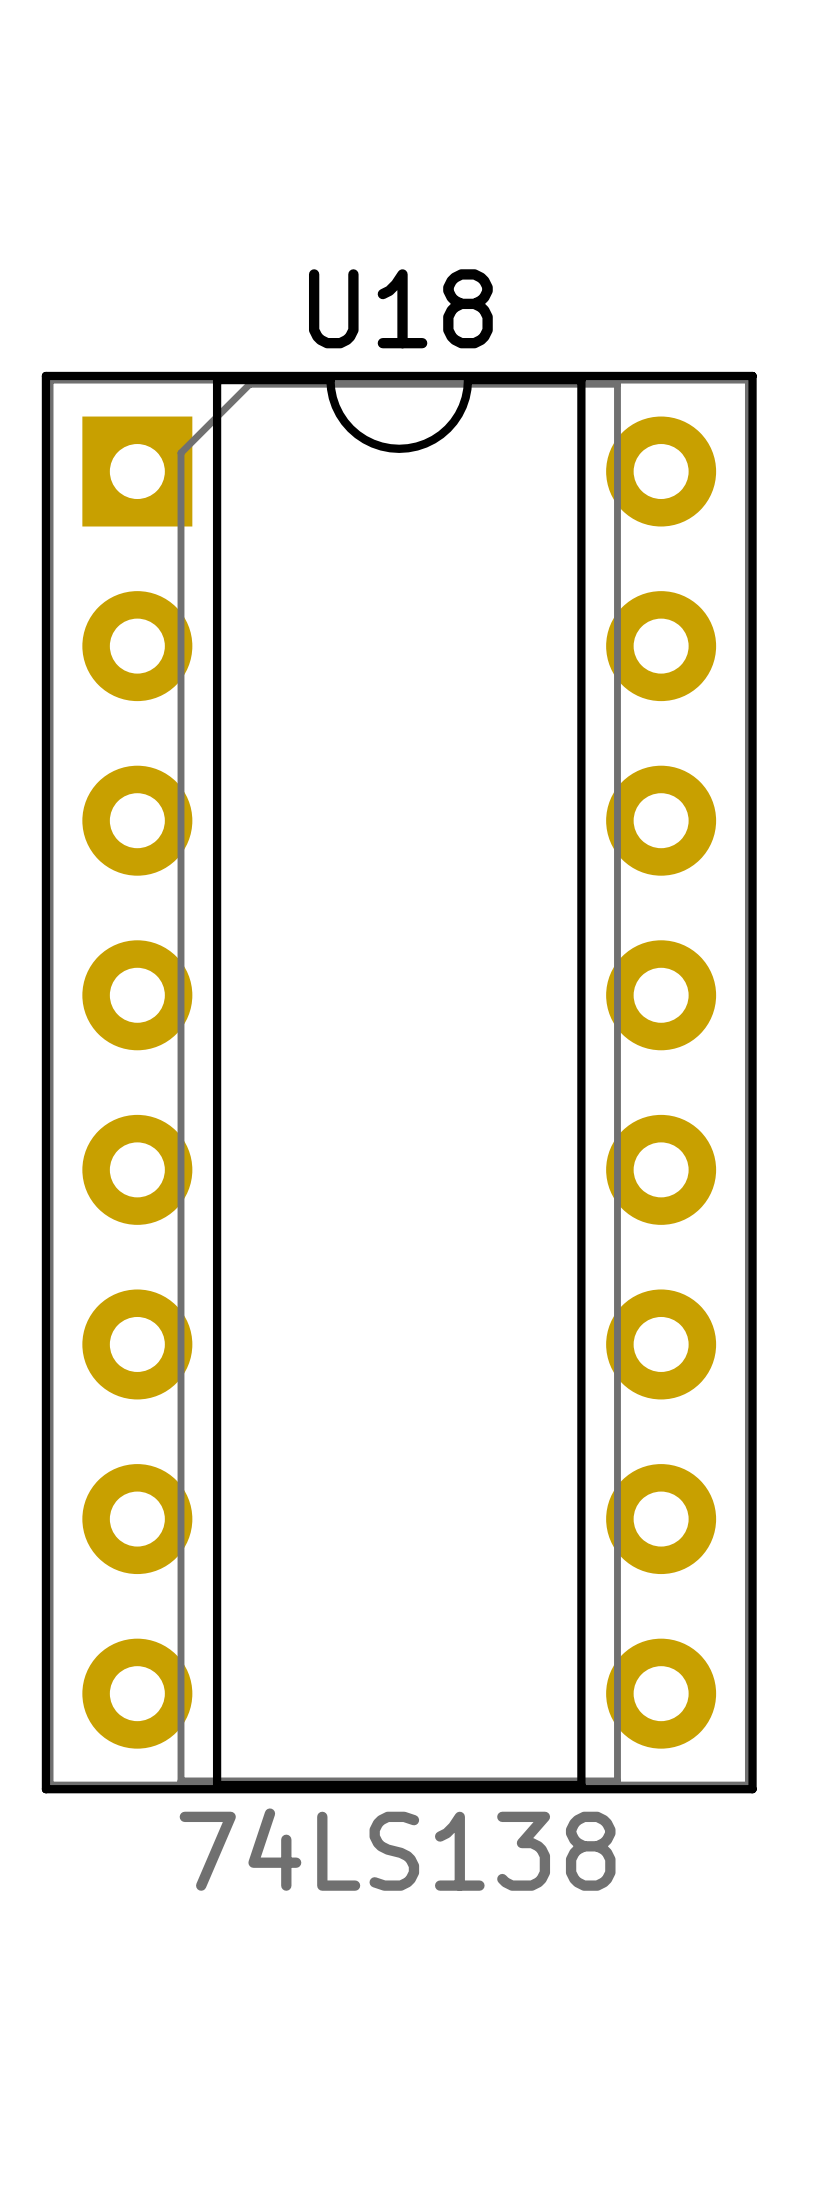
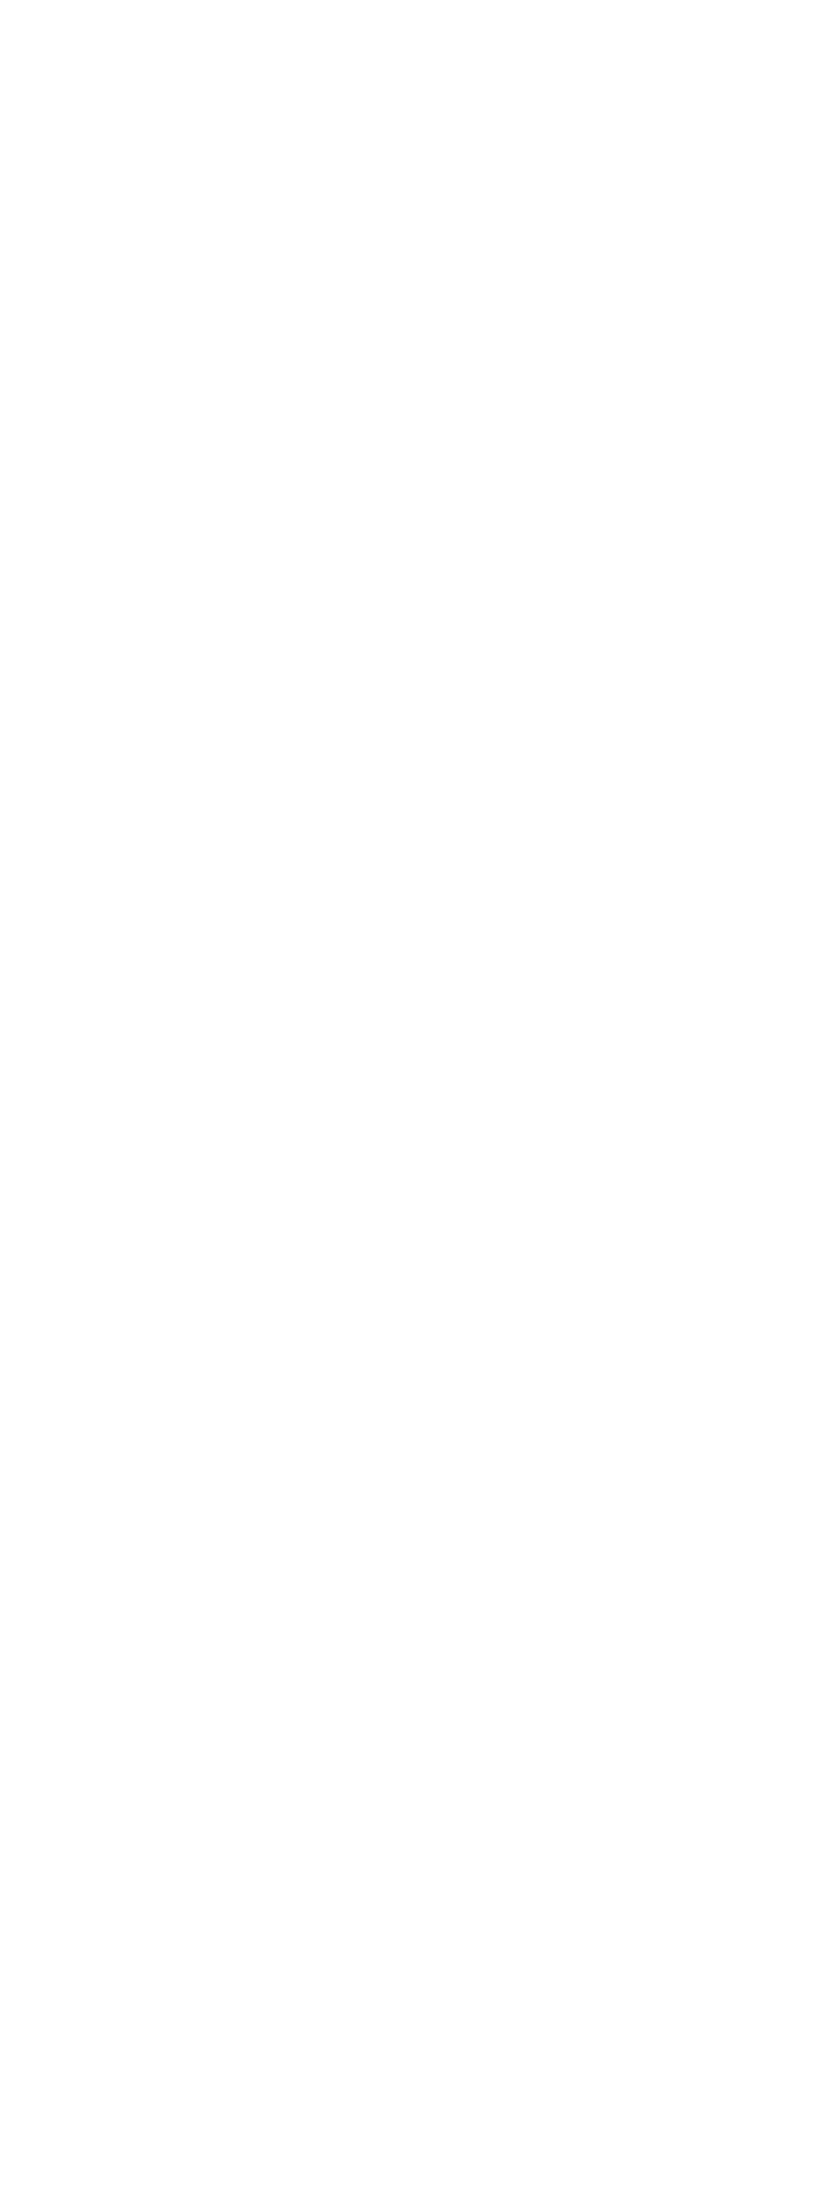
U18: 74LS138 (399, 1082) -> none

